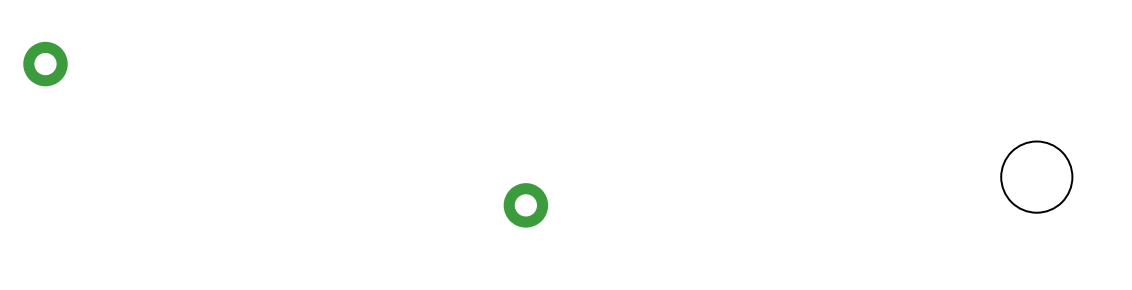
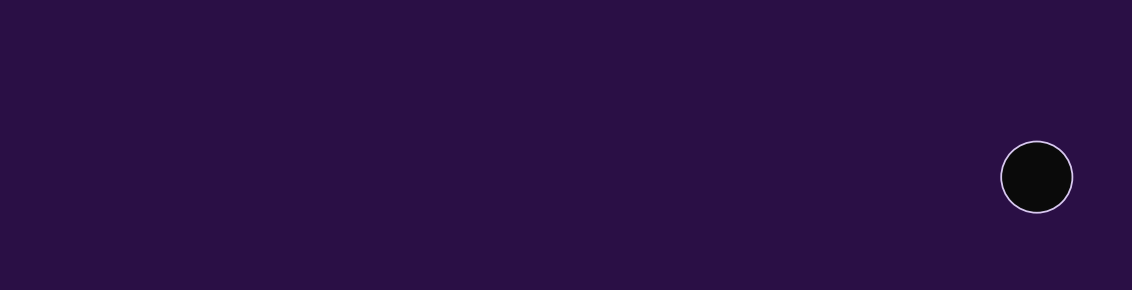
via: (45, 64) -> none
via: (525, 205) -> none

